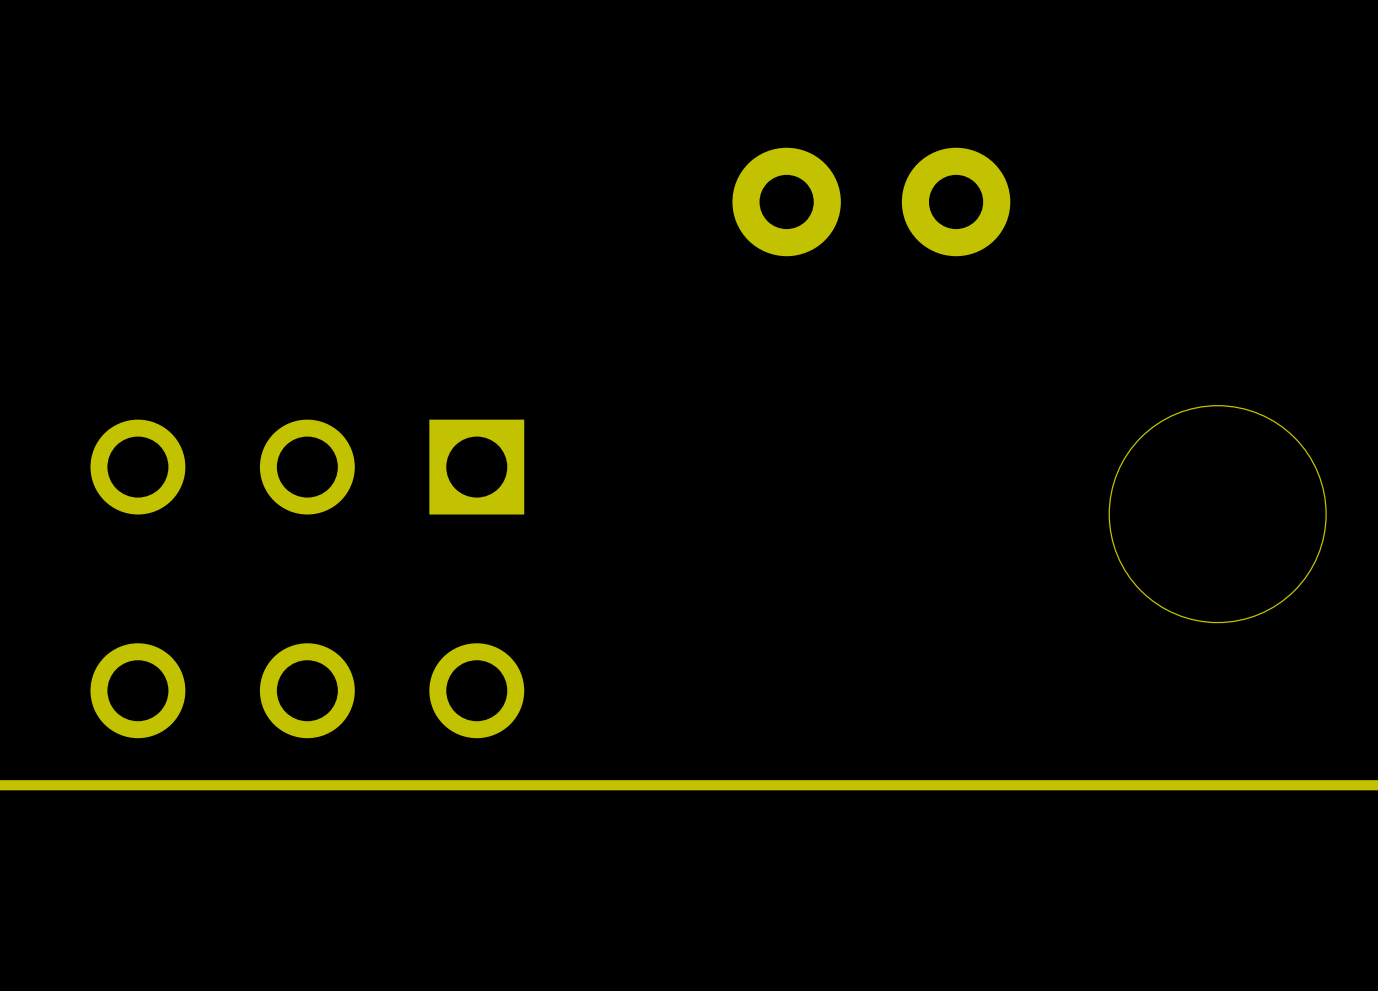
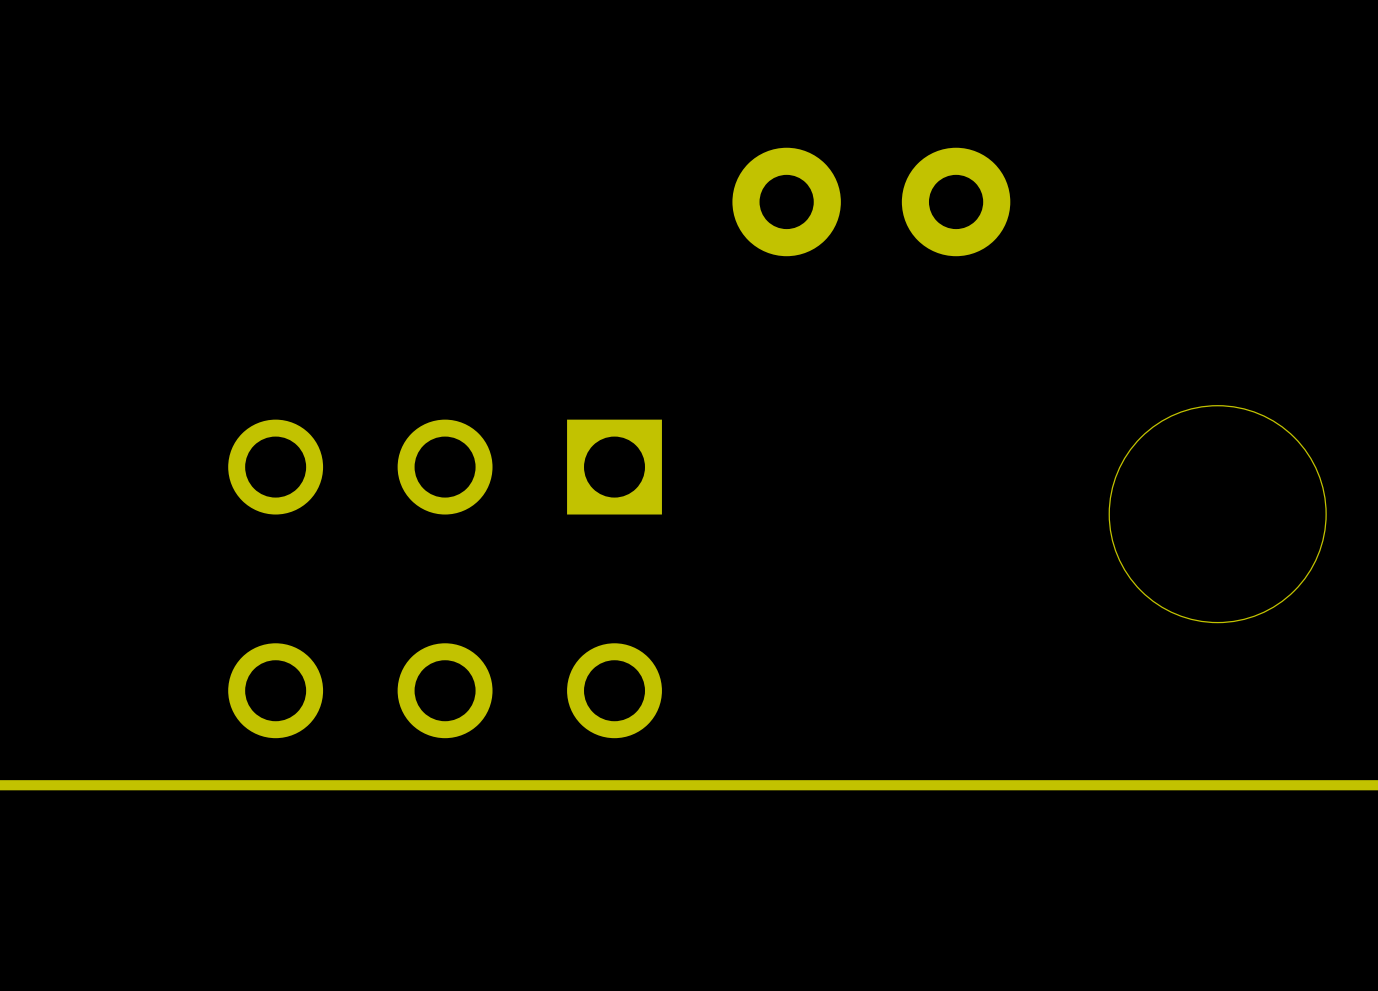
part position: (307, 578) -> (445, 578)

